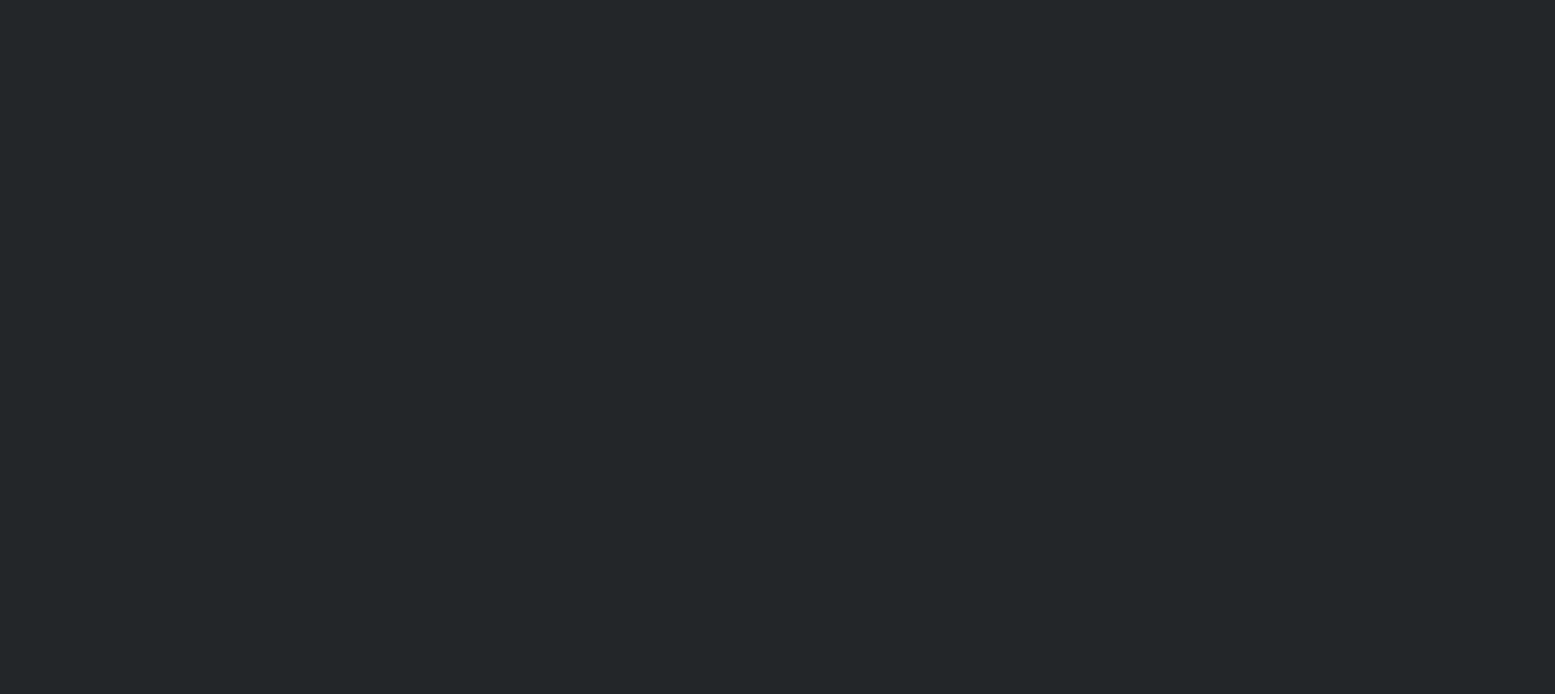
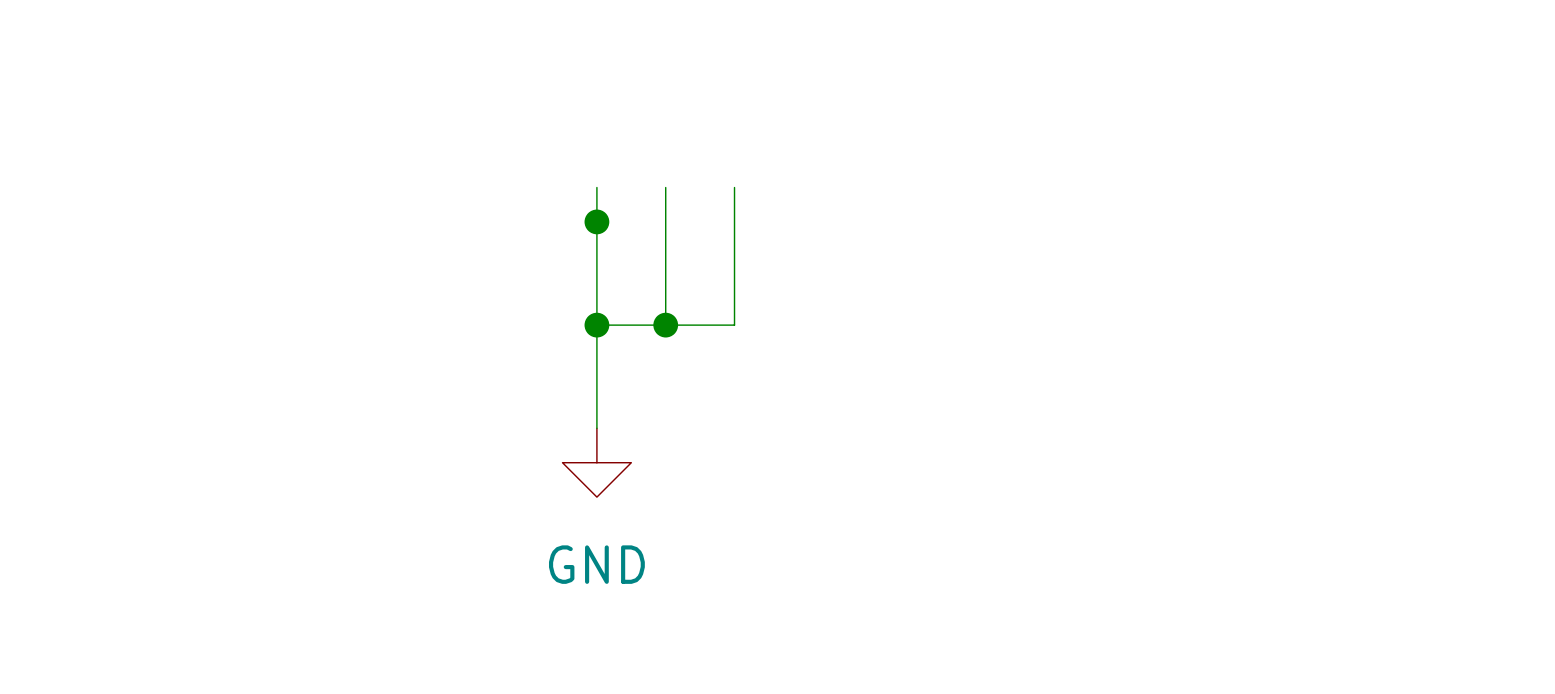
wire: none -> (596, 187) (596, 428)
wire: none -> (665, 187) (665, 325)
wire: none -> (734, 187) (734, 325) (596, 325)
junction: none -> (596, 221)
junction: none -> (596, 325)
junction: none -> (665, 325)
power symbol: none -> GND (596, 462)

